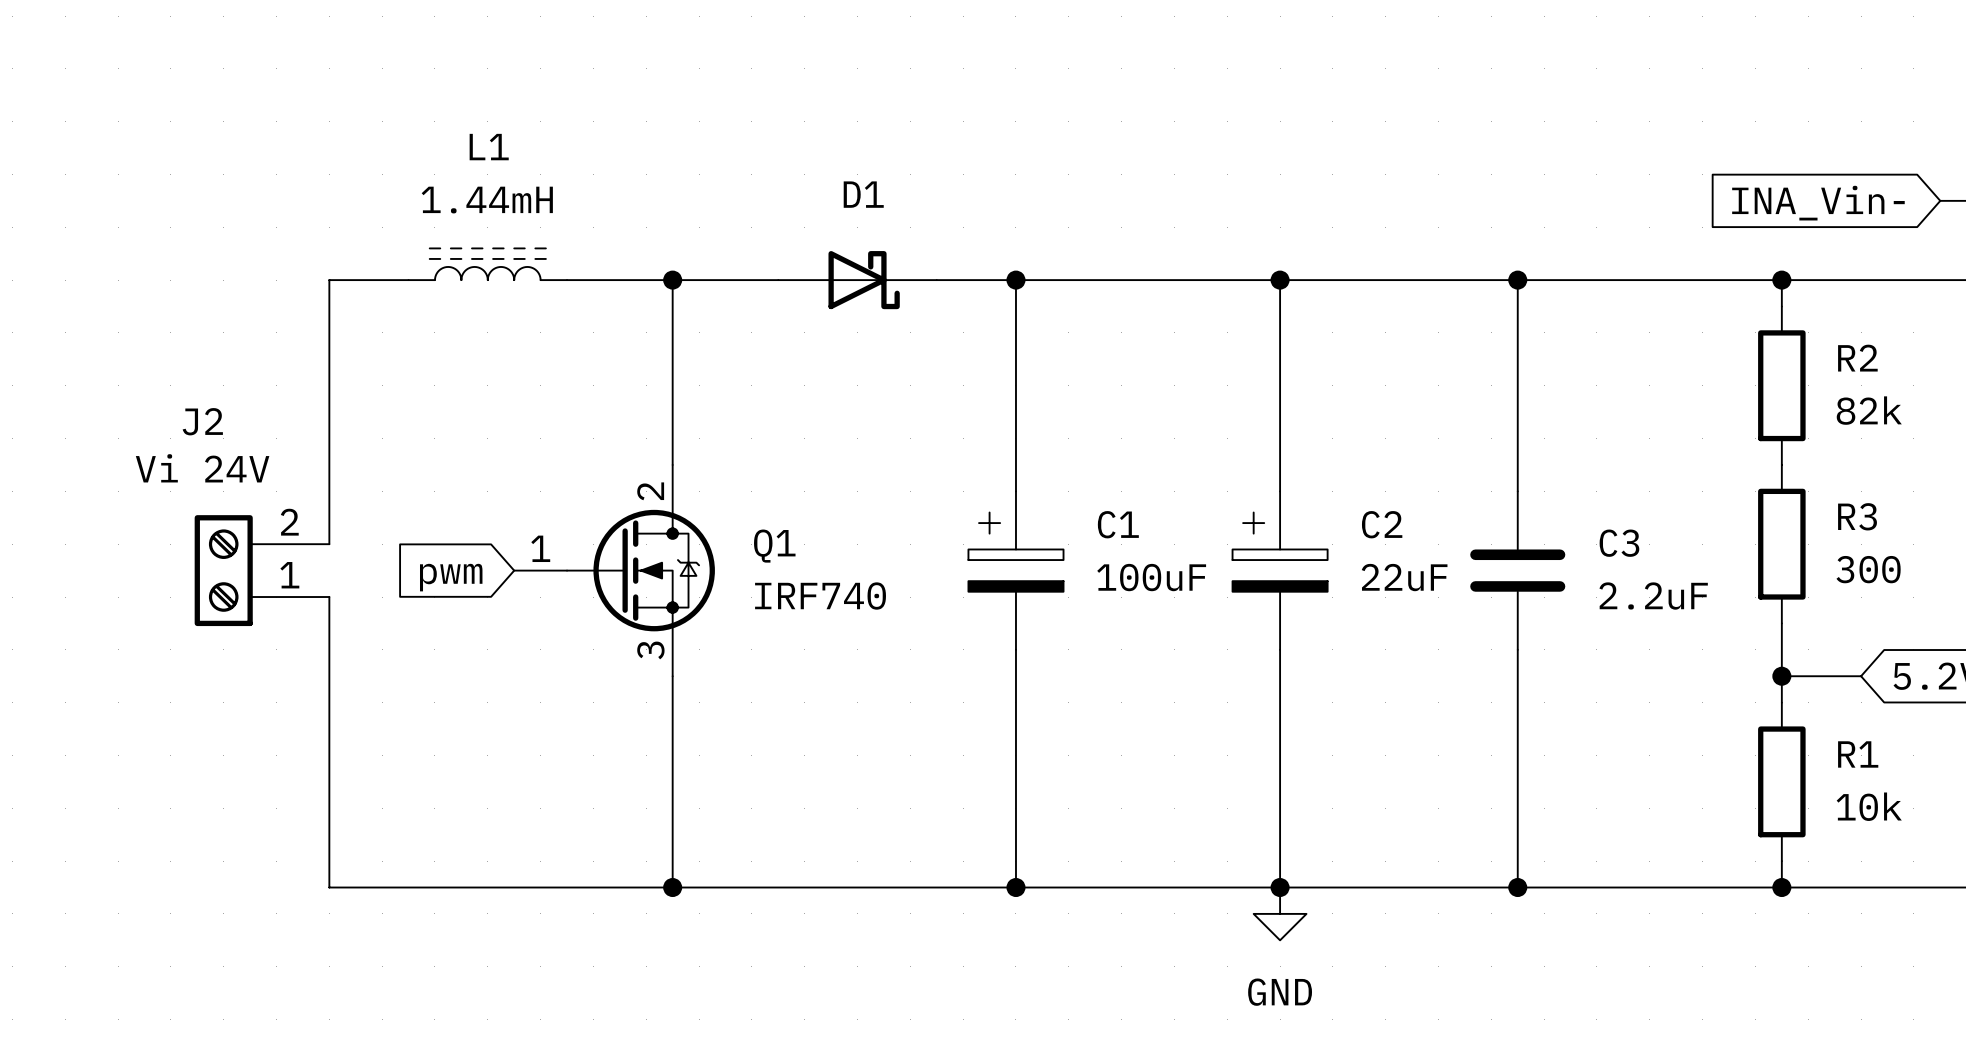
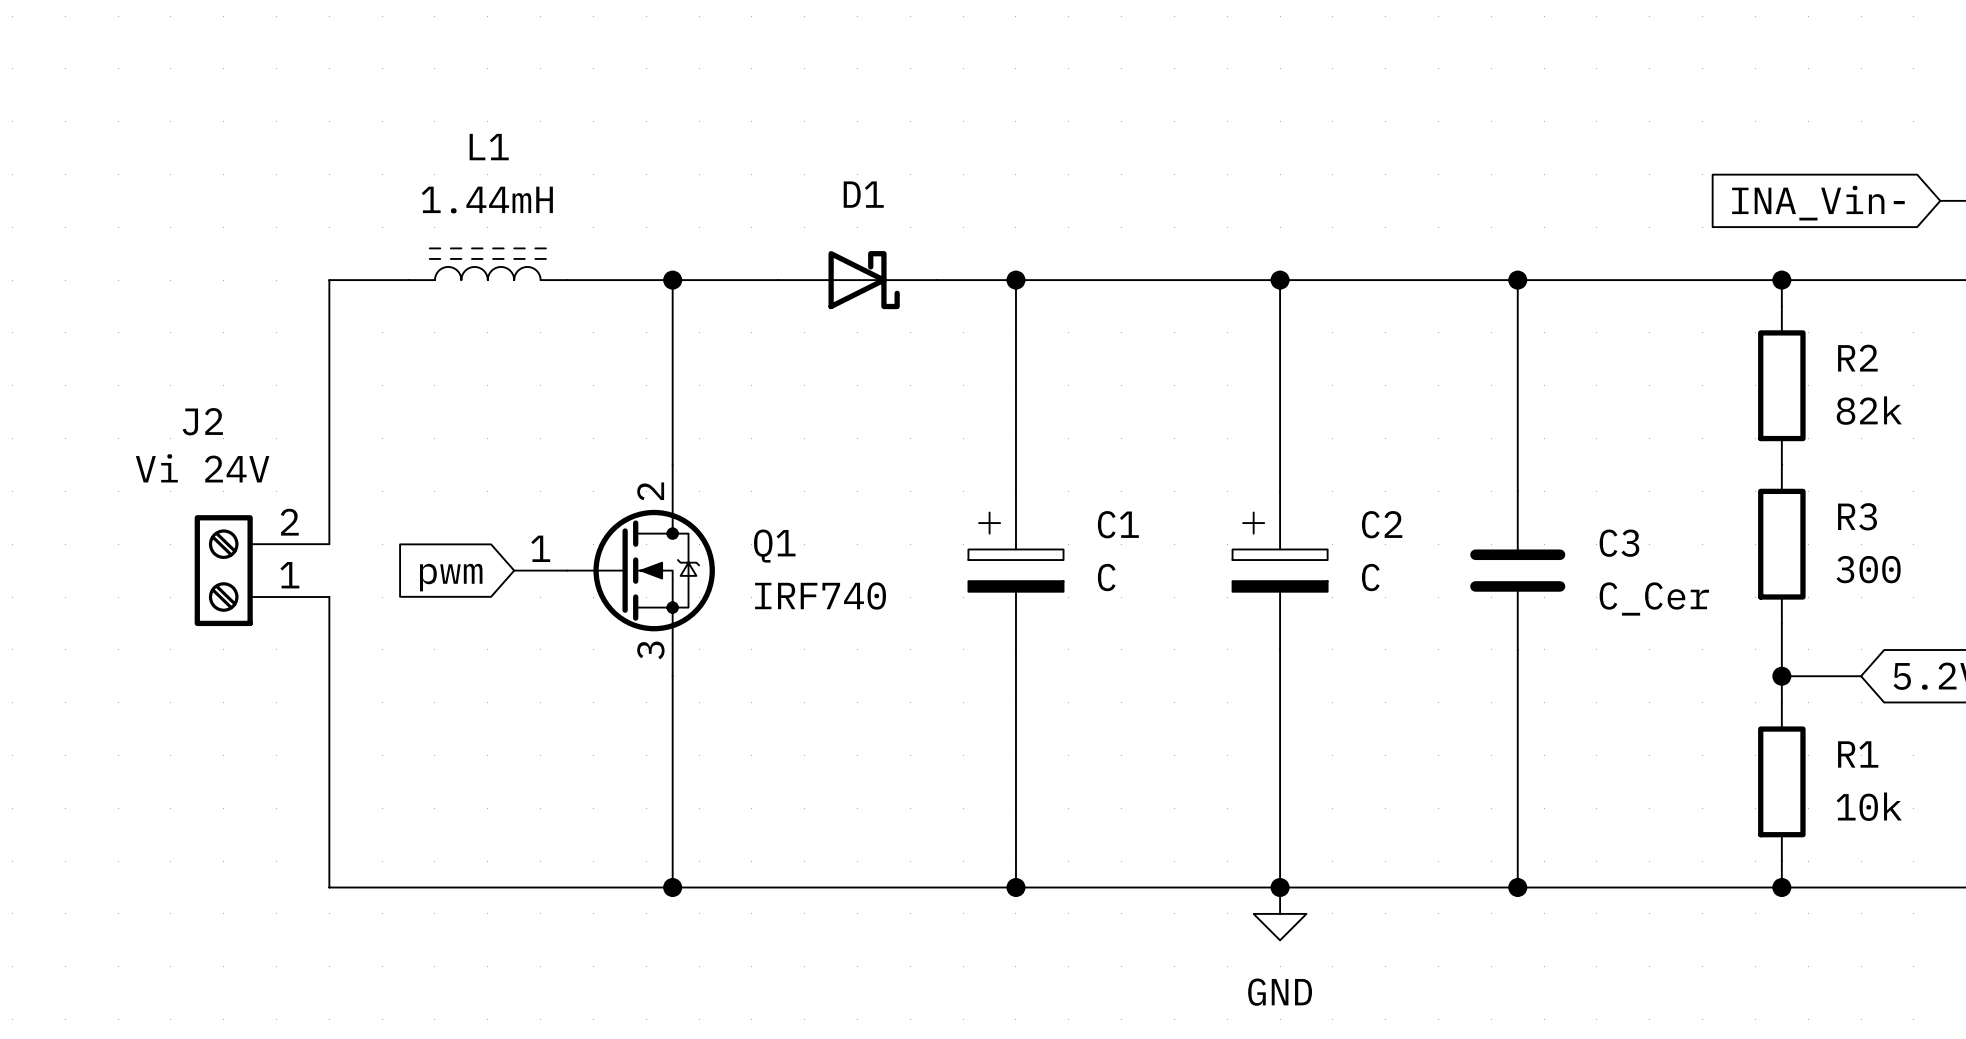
C1 value: 100uF (1151, 577) -> C (1106, 577)
C2 value: 22uF (1404, 577) -> C (1370, 577)
C3 value: 2.2uF (1653, 596) -> C_Cer (1654, 598)

